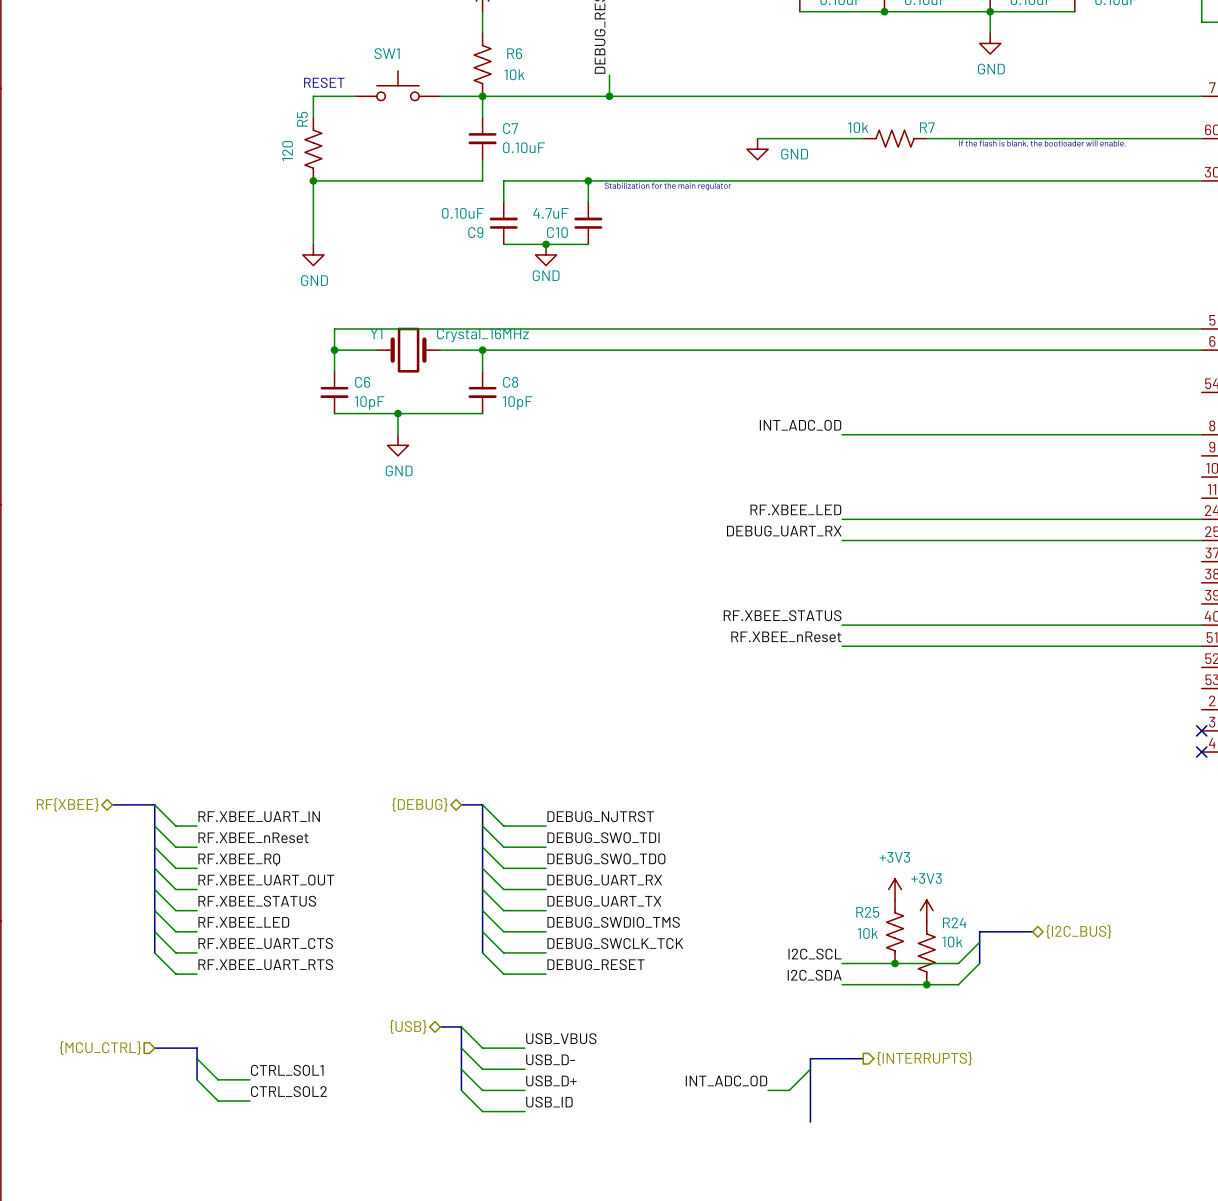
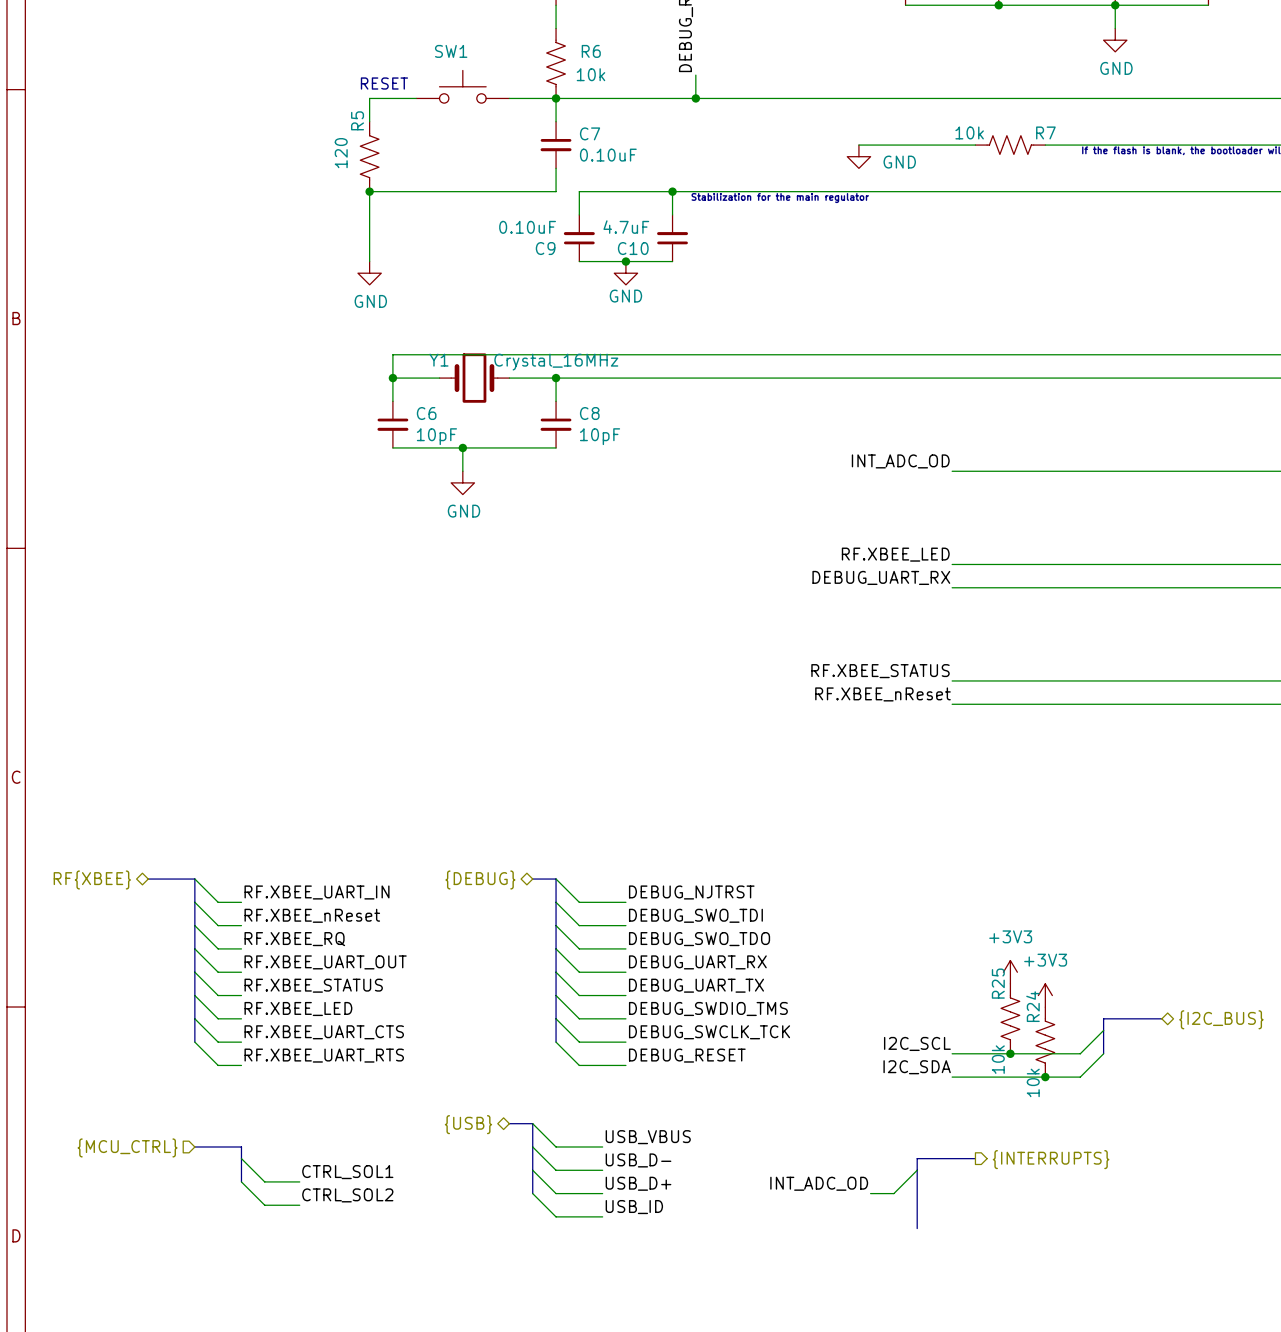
R25 name rotation: 0° (867, 912) -> 90° counterclockwise (998, 983)
R24 name rotation: 0° (954, 922) -> 90° counterclockwise (1032, 1006)
R24 name position: R24 (954, 922) -> R24 (1032, 1006)
R25 value rotation: 0° (867, 933) -> 90° counterclockwise (998, 1059)
R25 value position: 10k (867, 933) -> 10k (998, 1059)
R24 value rotation: 0° (952, 941) -> 90° counterclockwise (1033, 1082)
R24 value position: 10k (952, 941) -> 10k (1033, 1082)

